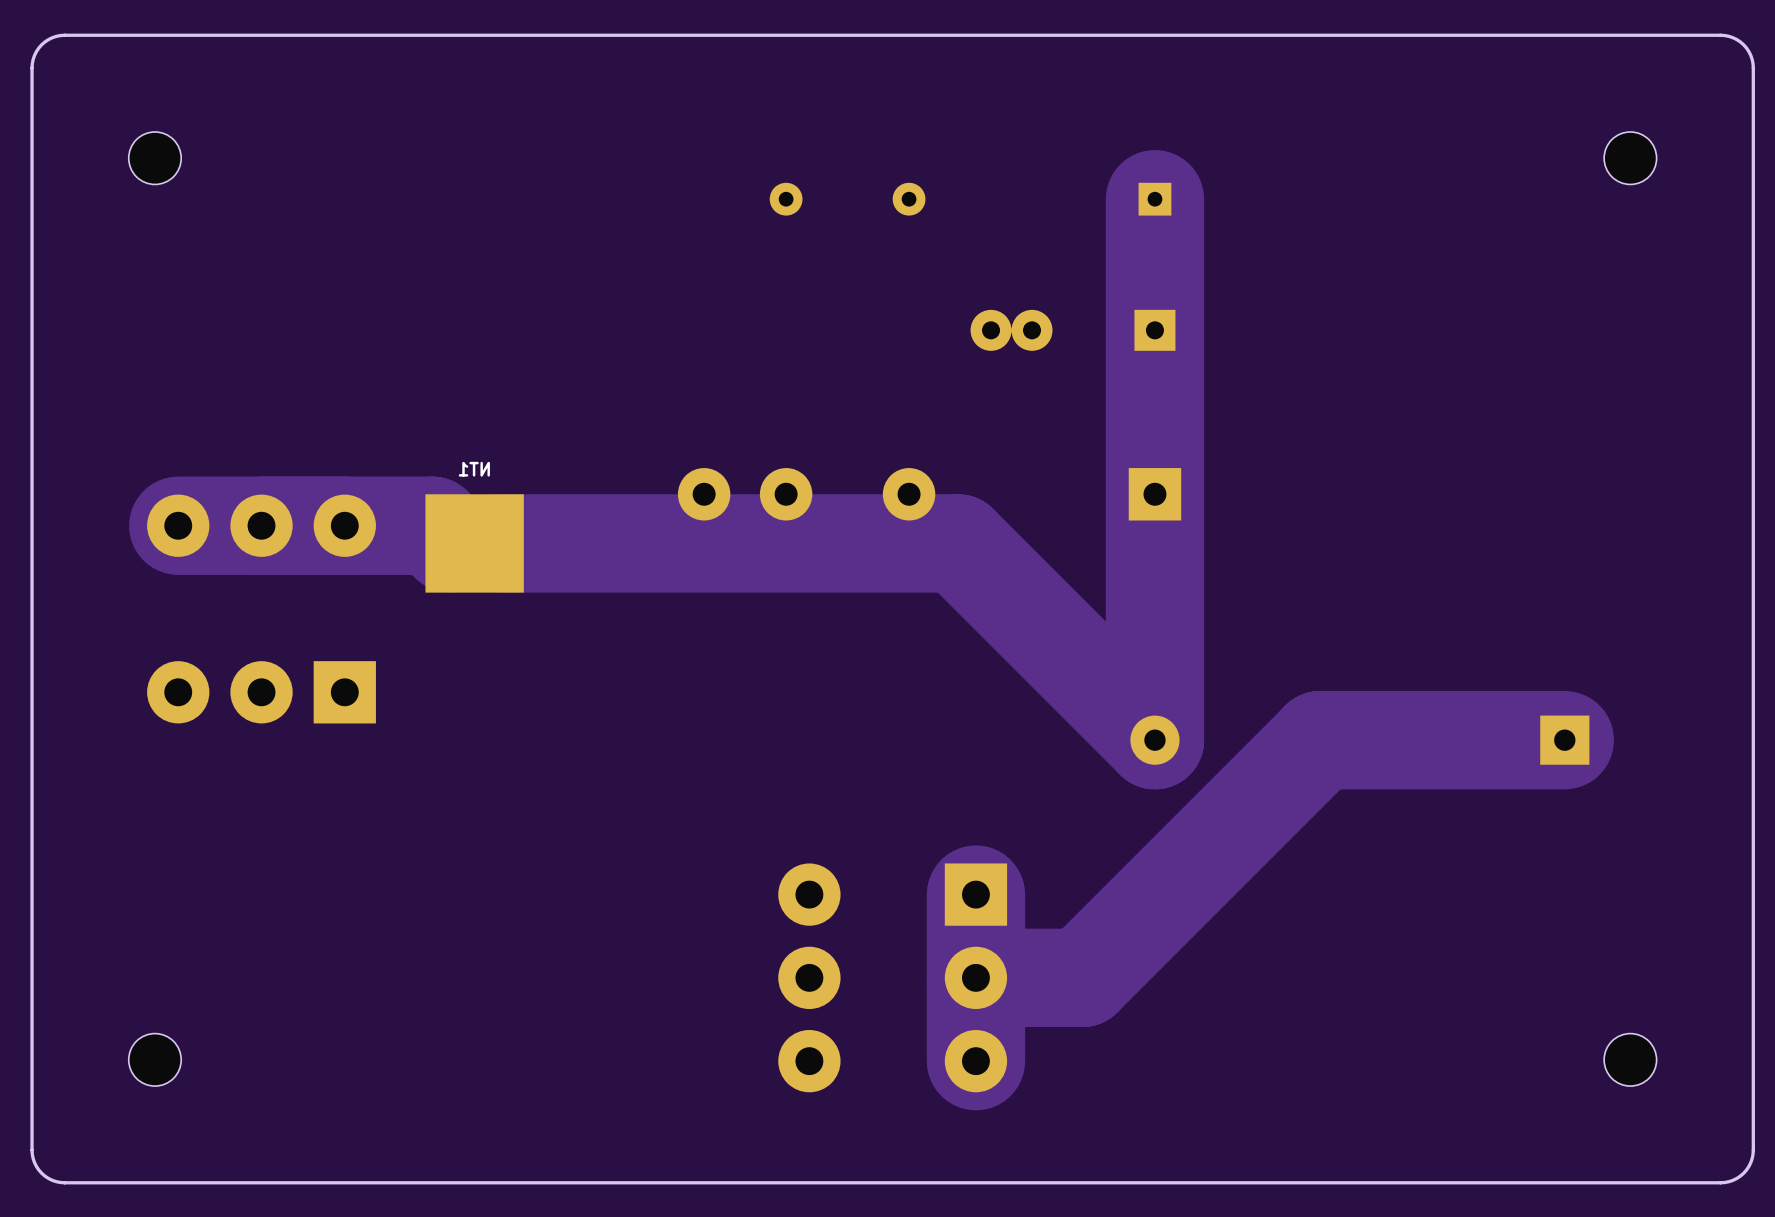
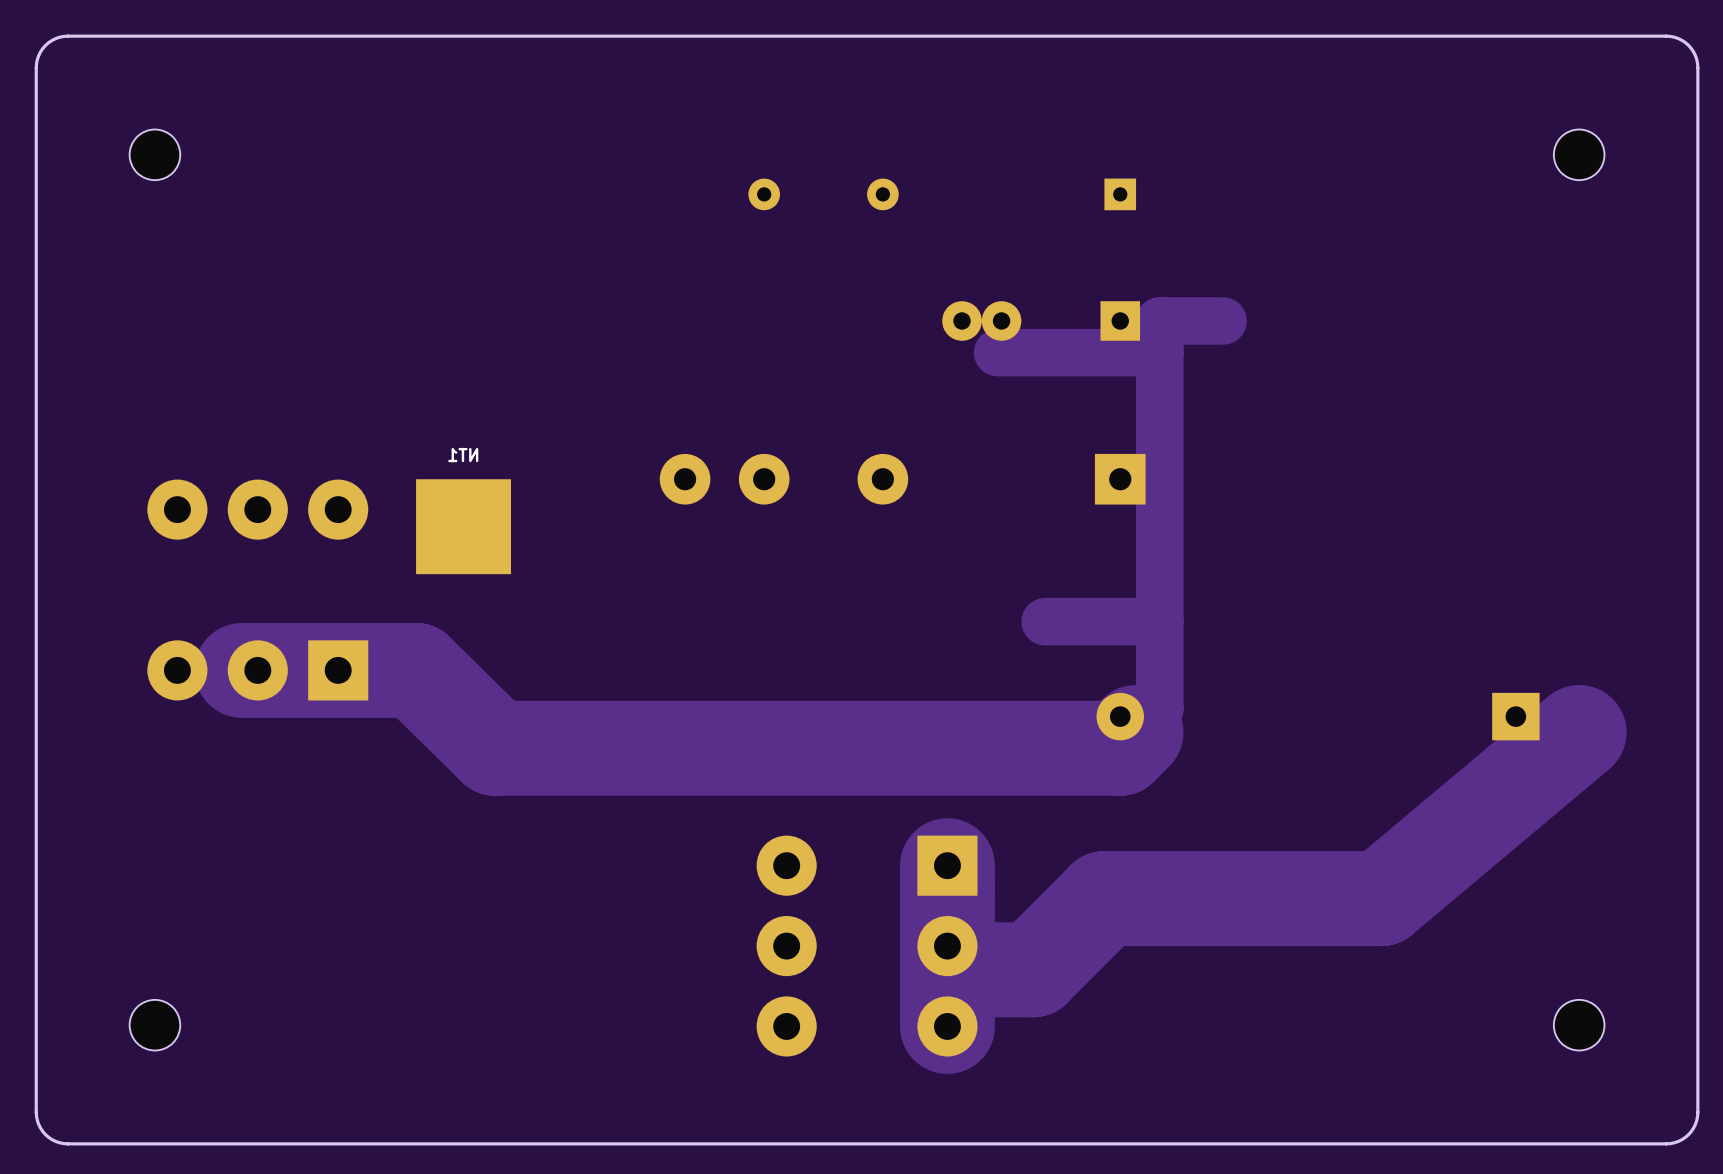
track: (1154, 199) (1154, 740) (958, 543) (499, 543) -> none
track: none -> (1223, 320) (1159, 320) (1159, 708) (1120, 748) (495, 748) (416, 670) (241, 670)
track: none -> (1159, 352) (997, 352)
track: (178, 525) (432, 525) (450, 543) -> none
track: none -> (1159, 621) (1045, 621)
track: (1564, 740) (1320, 740) (1082, 977) (975, 977) -> none
track: none -> (1579, 732) (1381, 898) (1104, 898) (1033, 969) (947, 969)

